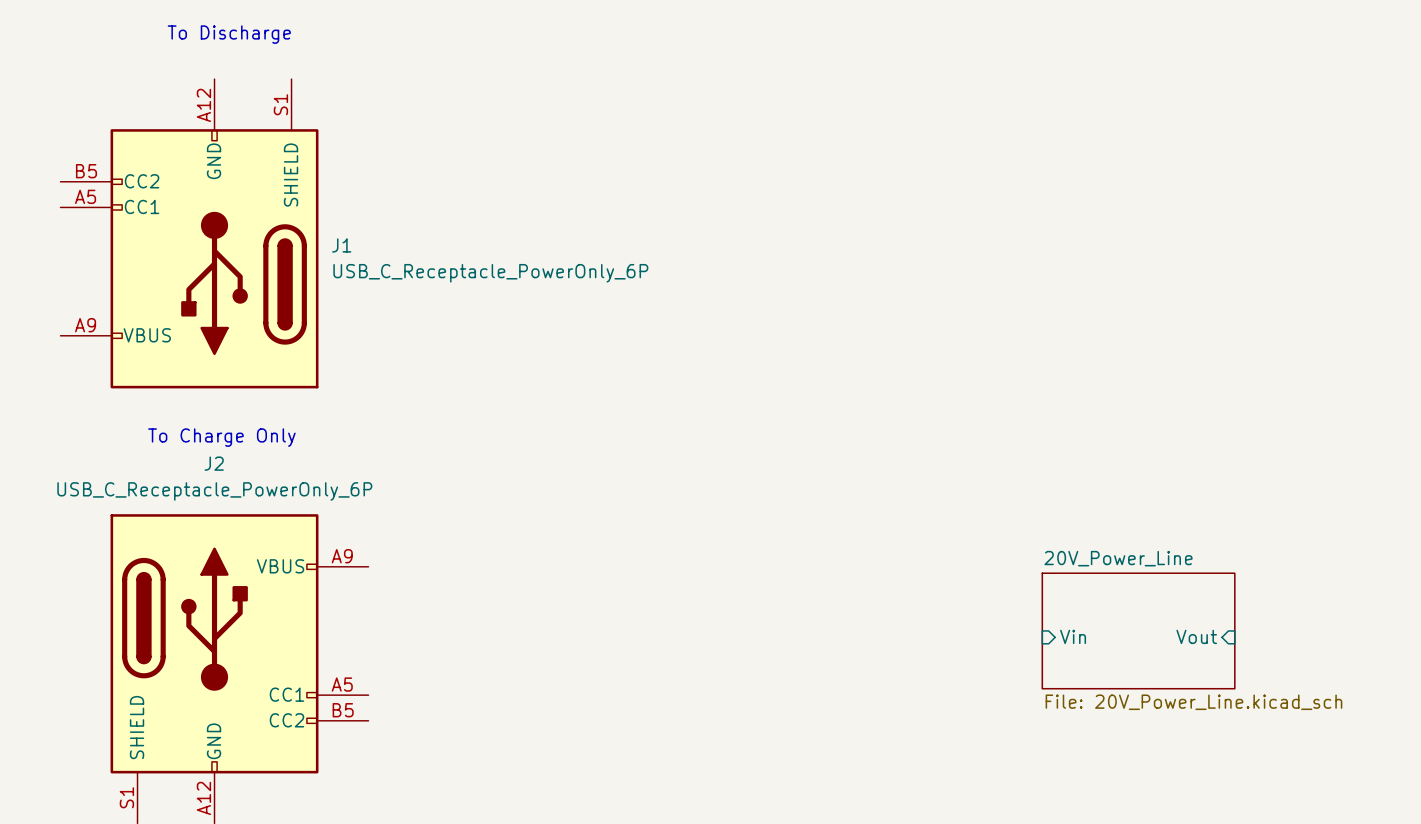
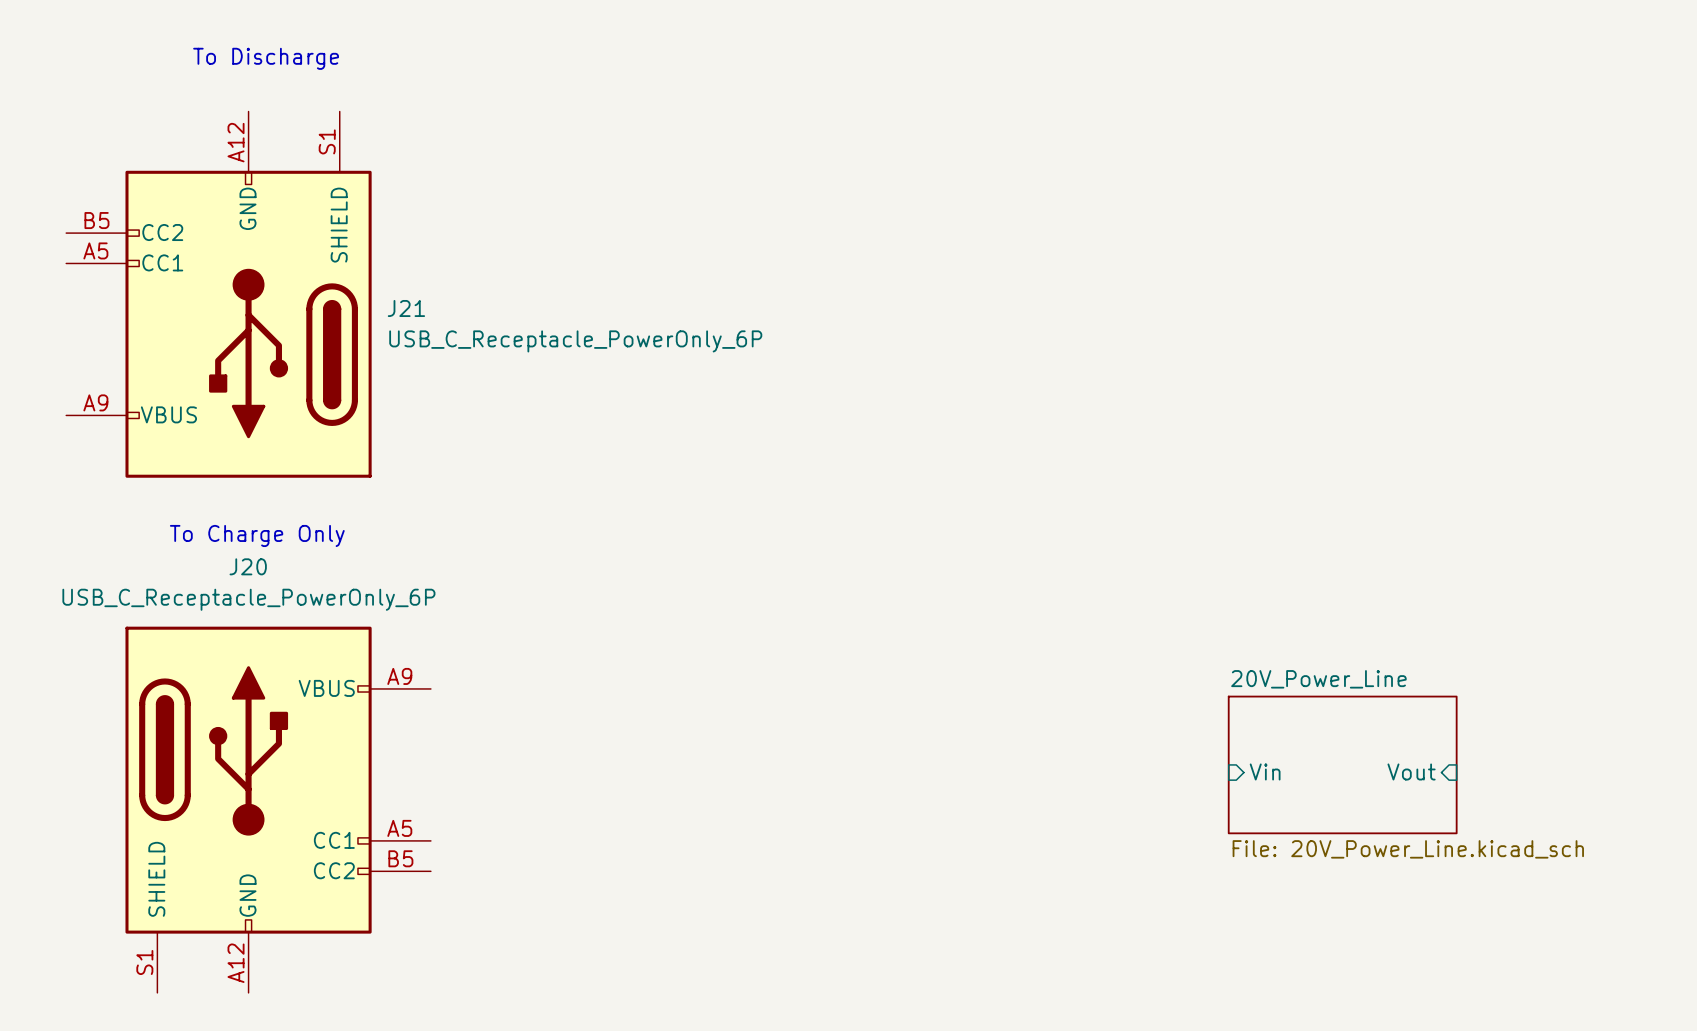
J1 name: J1 (341, 245) -> J21 (406, 308)
J2 name: J2 (214, 463) -> J20 (248, 566)

